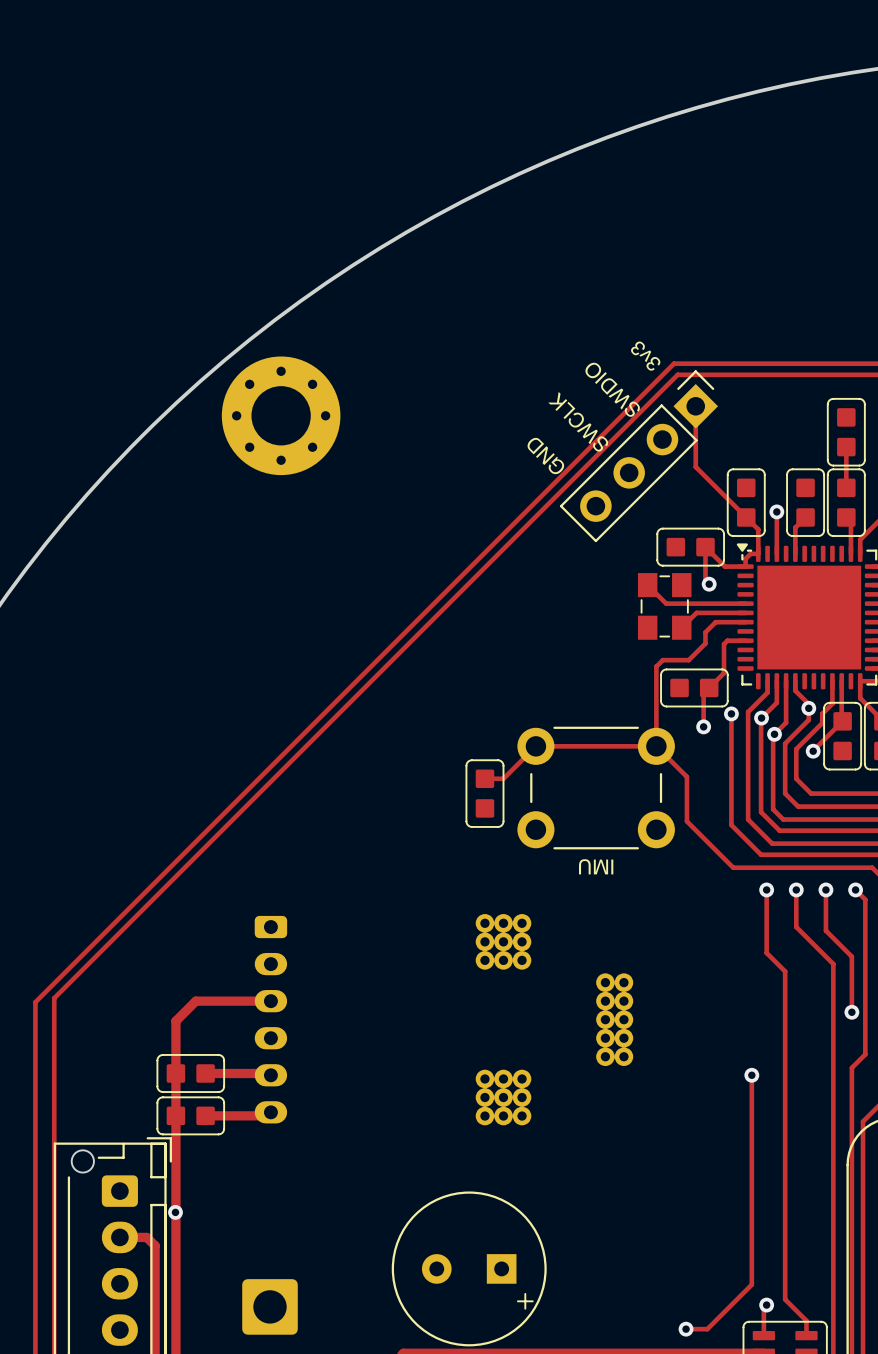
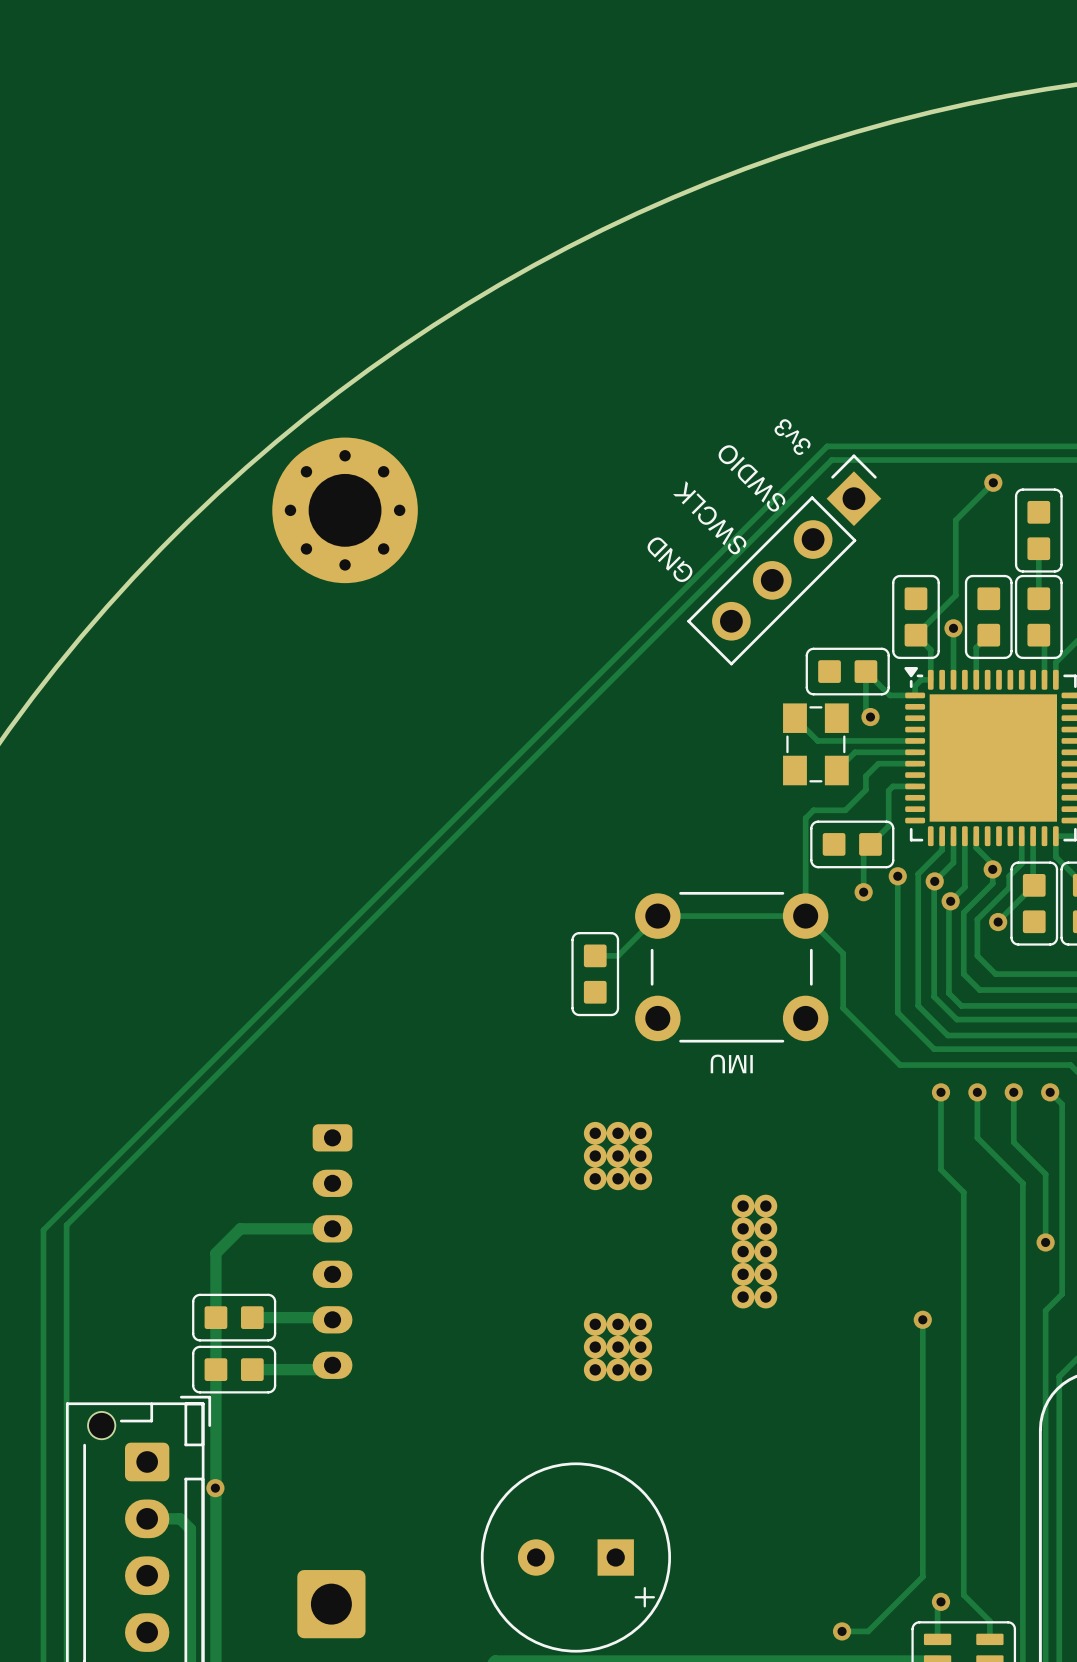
via: none -> (993, 482)
track: (695, 406) (695, 466) (746, 517) -> (993, 482) (955, 520) (955, 595) (915, 635)

